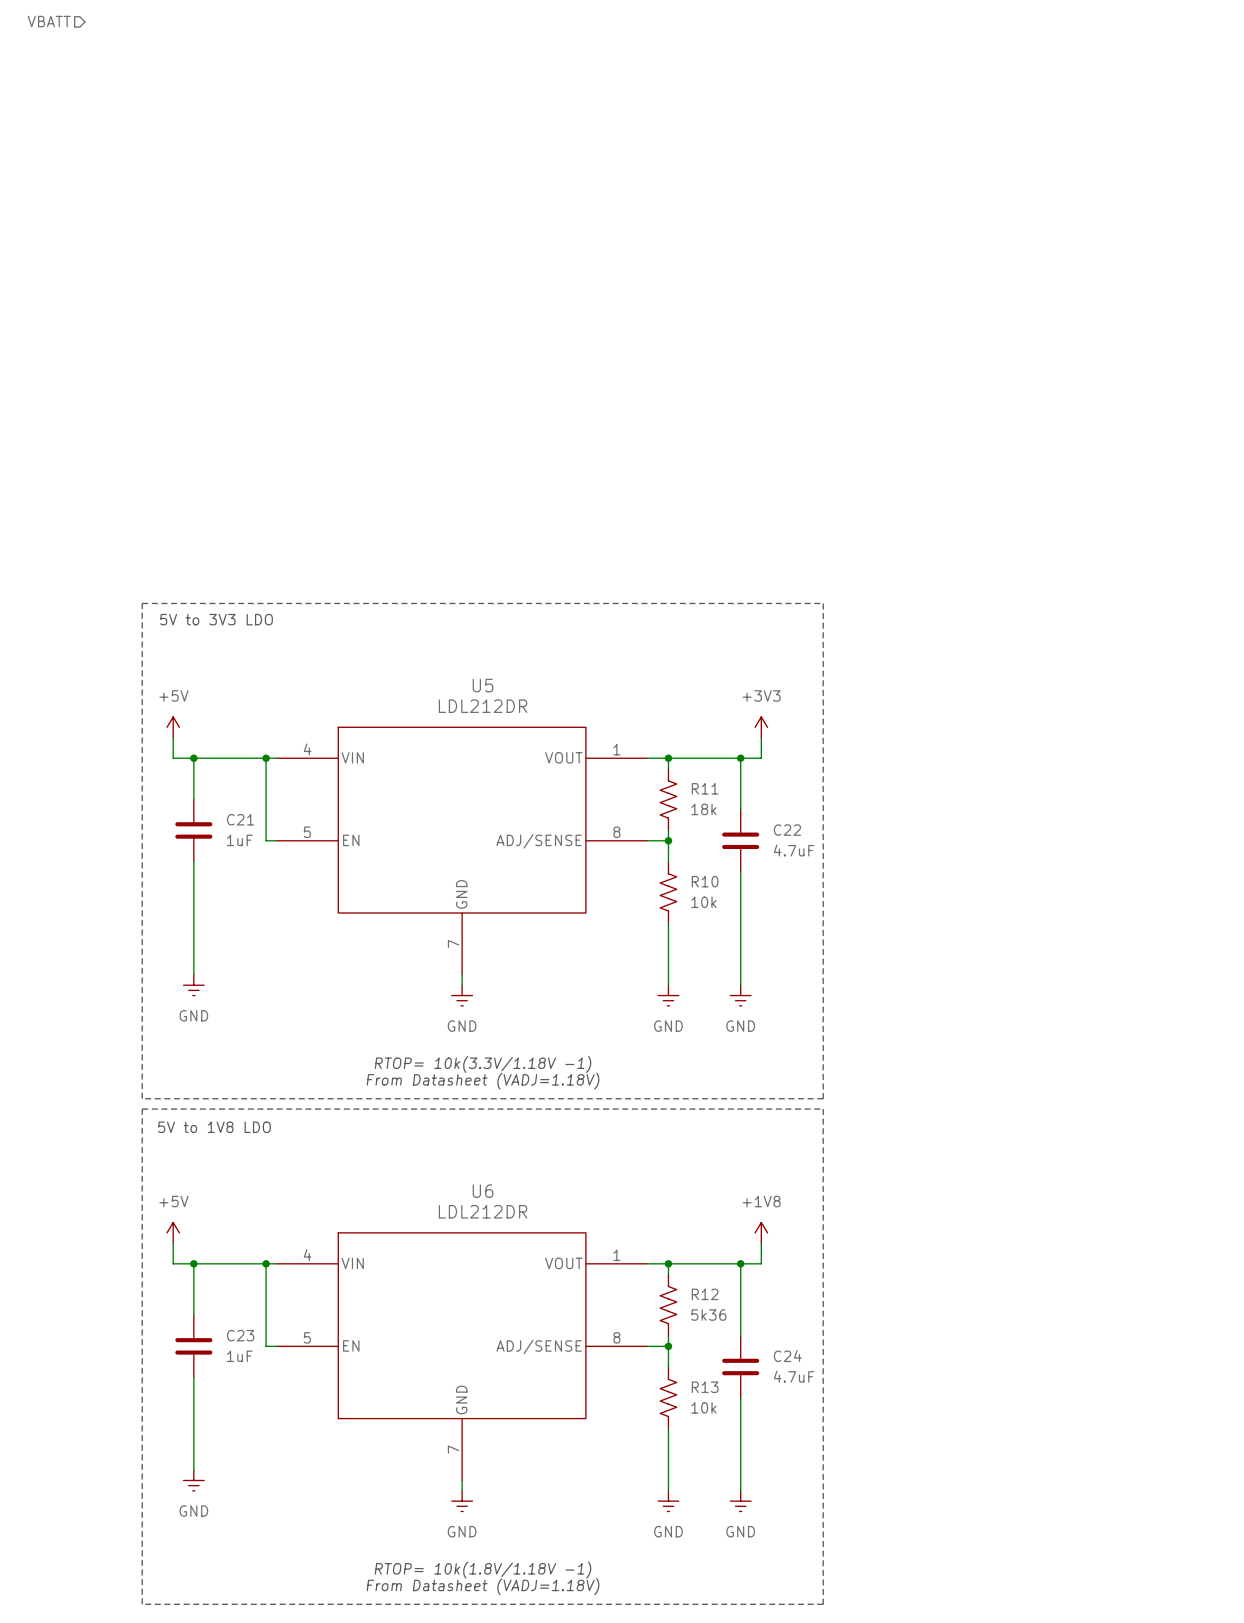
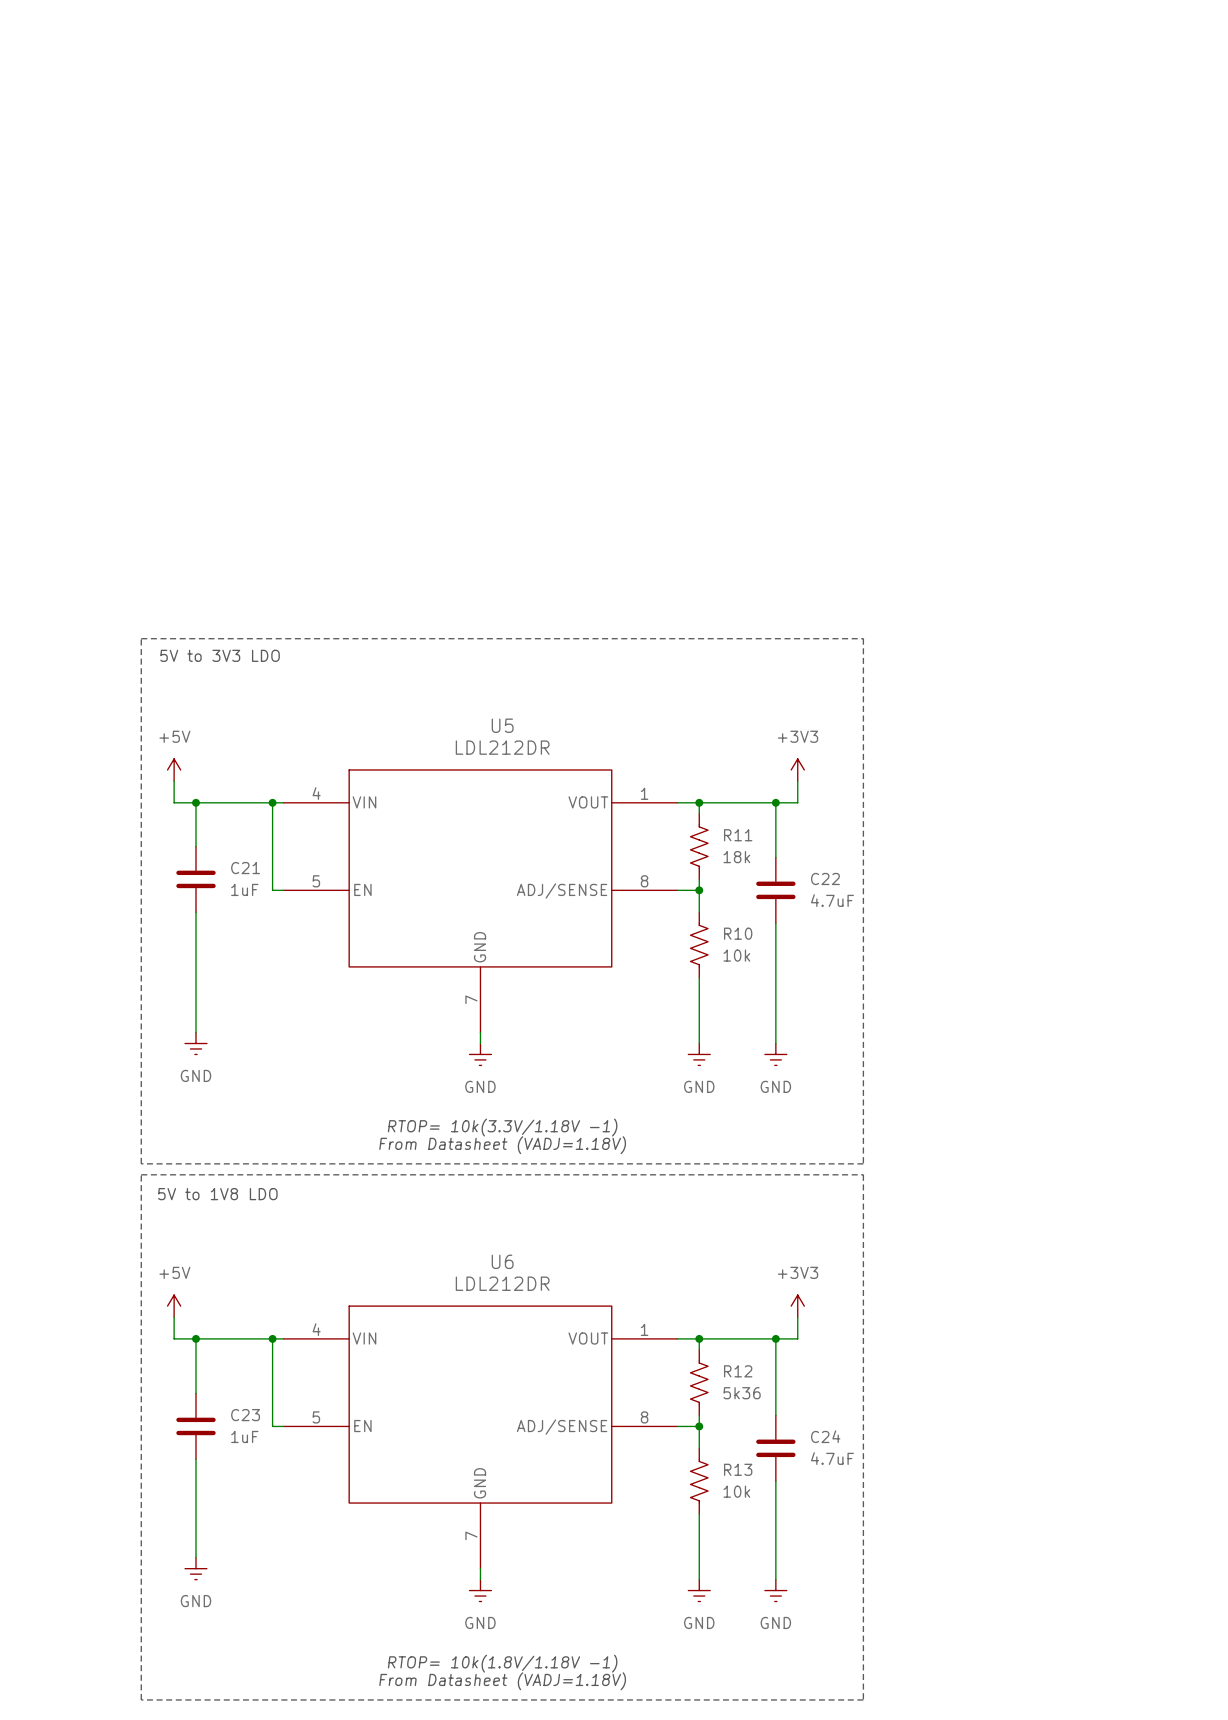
hierarchical label: VBATT (49, 21) -> none
power symbol: +1V8 (761, 1232) -> +3V3 (797, 1306)

